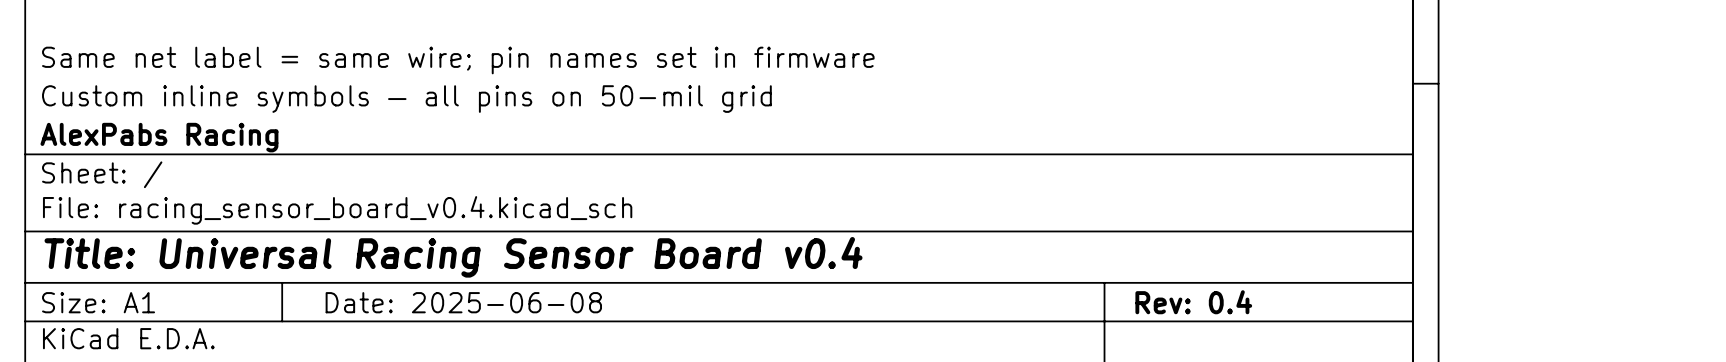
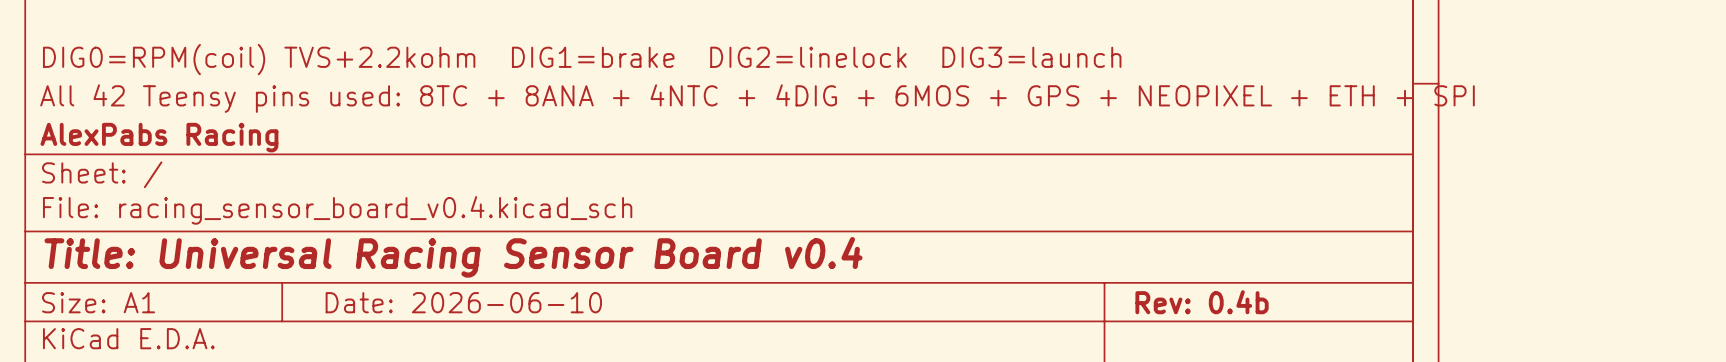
title block: Same net label = same wire; pin names set in firmware (458, 60) -> DIG0=RPM(coil) TVS+2.2kohm DIG1=brake DIG2=linelock DIG3=launch (582, 59)
title block: Custom inline symbols — all pins on 50-mil grid (406, 99) -> All 42 Teensy pins used: 8TC + 8ANA + 4NTC + 4DIG + 6MOS + GPS + NEOPIXEL + ETH + SPI (757, 98)
title block: Date: 2025-06-08 (463, 302) -> Date: 2026-06-10 (463, 302)
title block: Rev: 0.4 (1193, 302) -> Rev: 0.4b (1202, 302)

